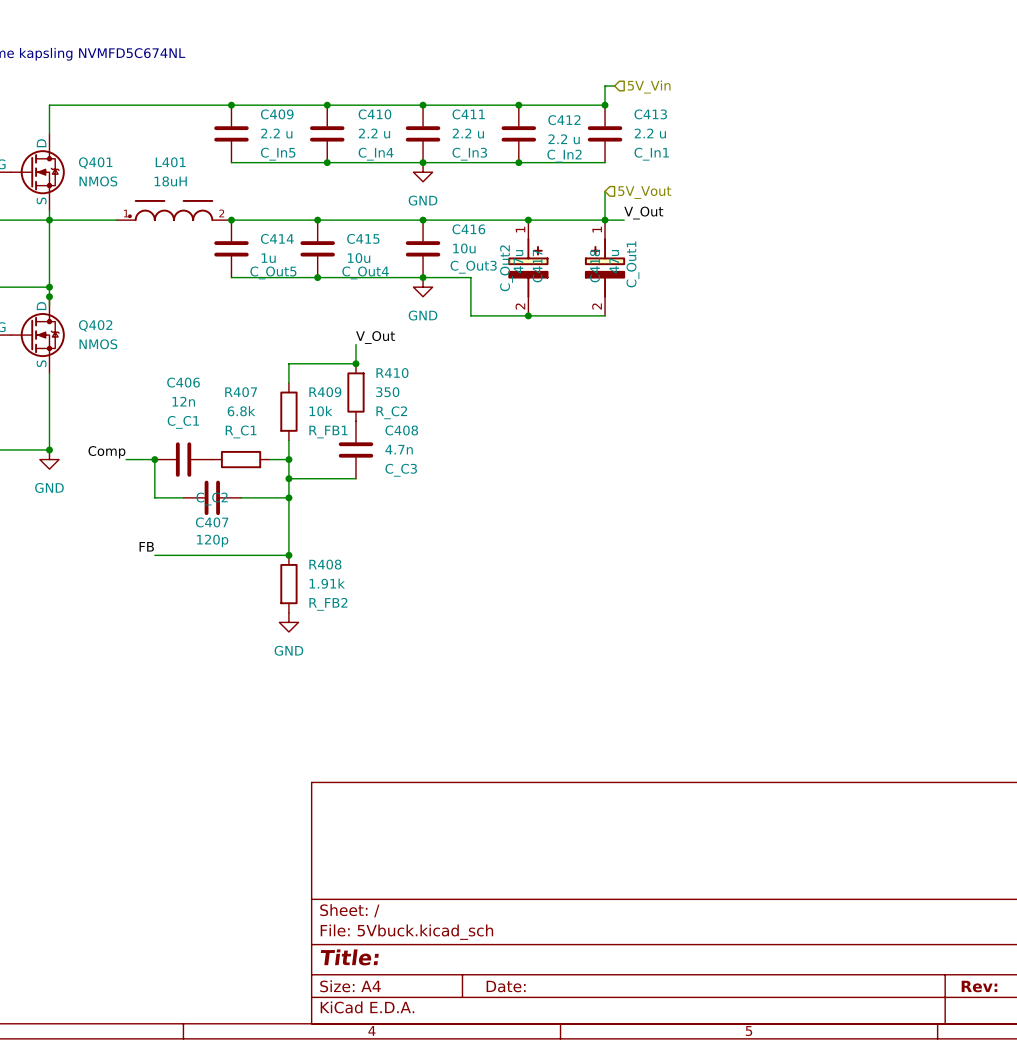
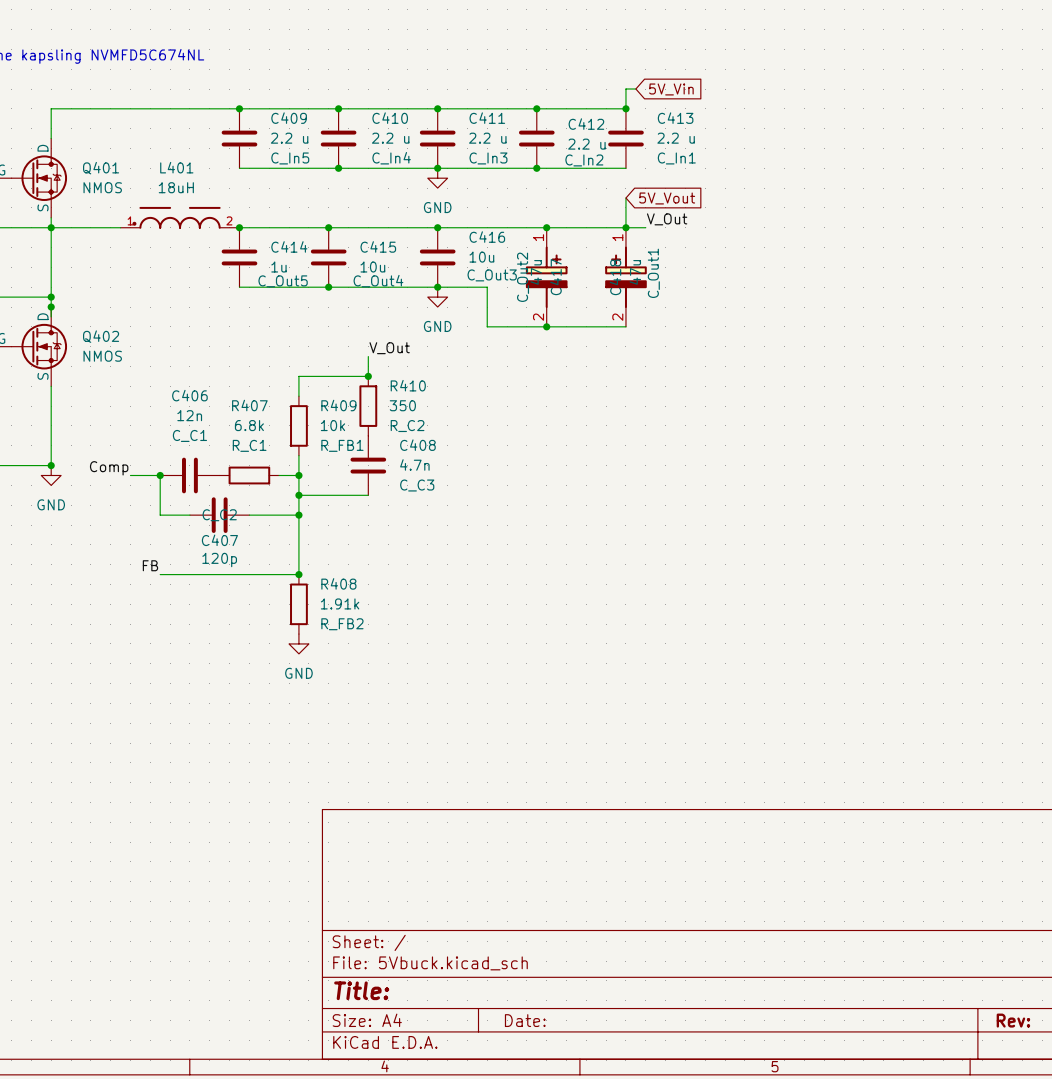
global label: none -> 5V_Vin (671, 89)
hierarchical label: 5V_Vin (649, 87) -> none
global label: none -> 5V_Vout (667, 198)
hierarchical label: 5V_Vout (644, 192) -> none

